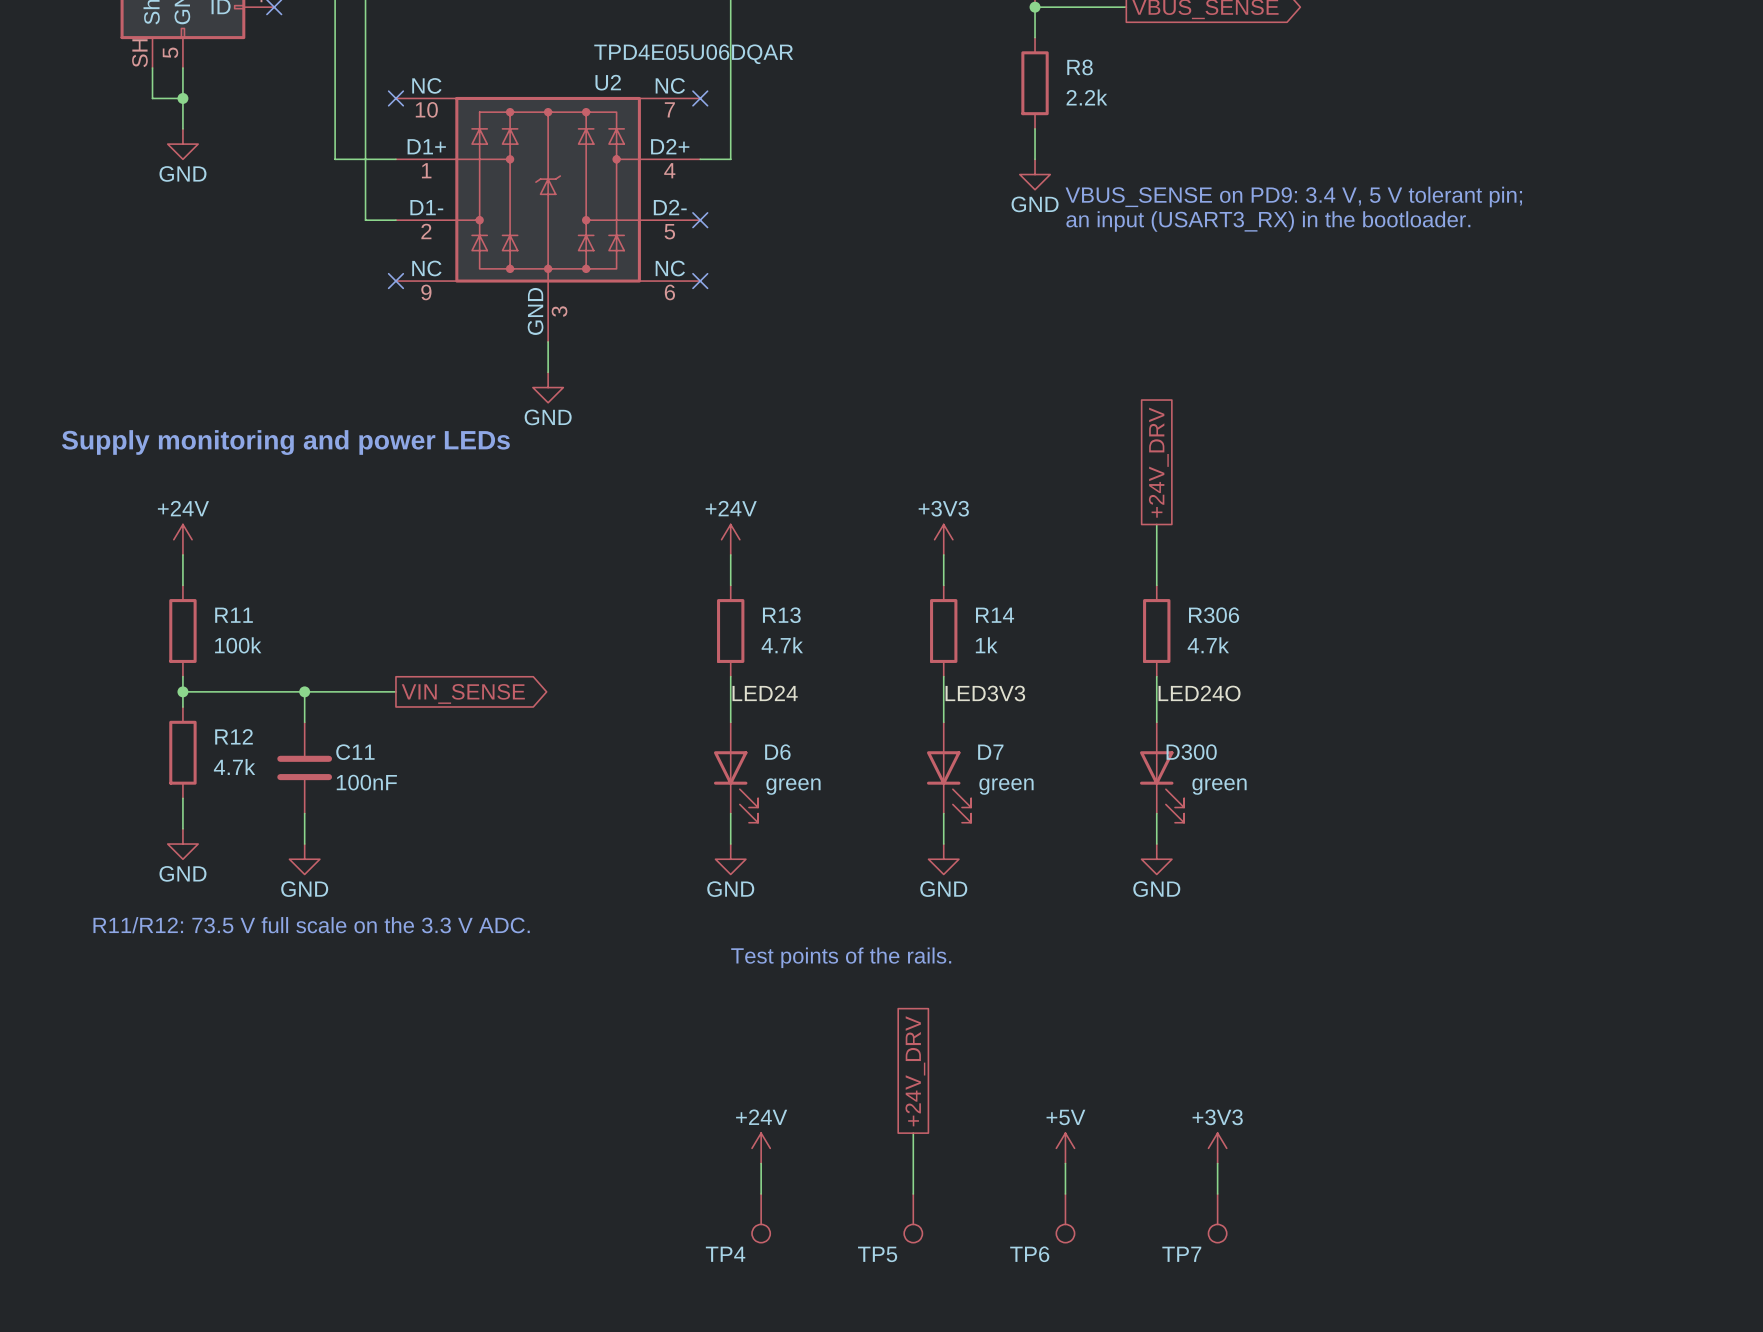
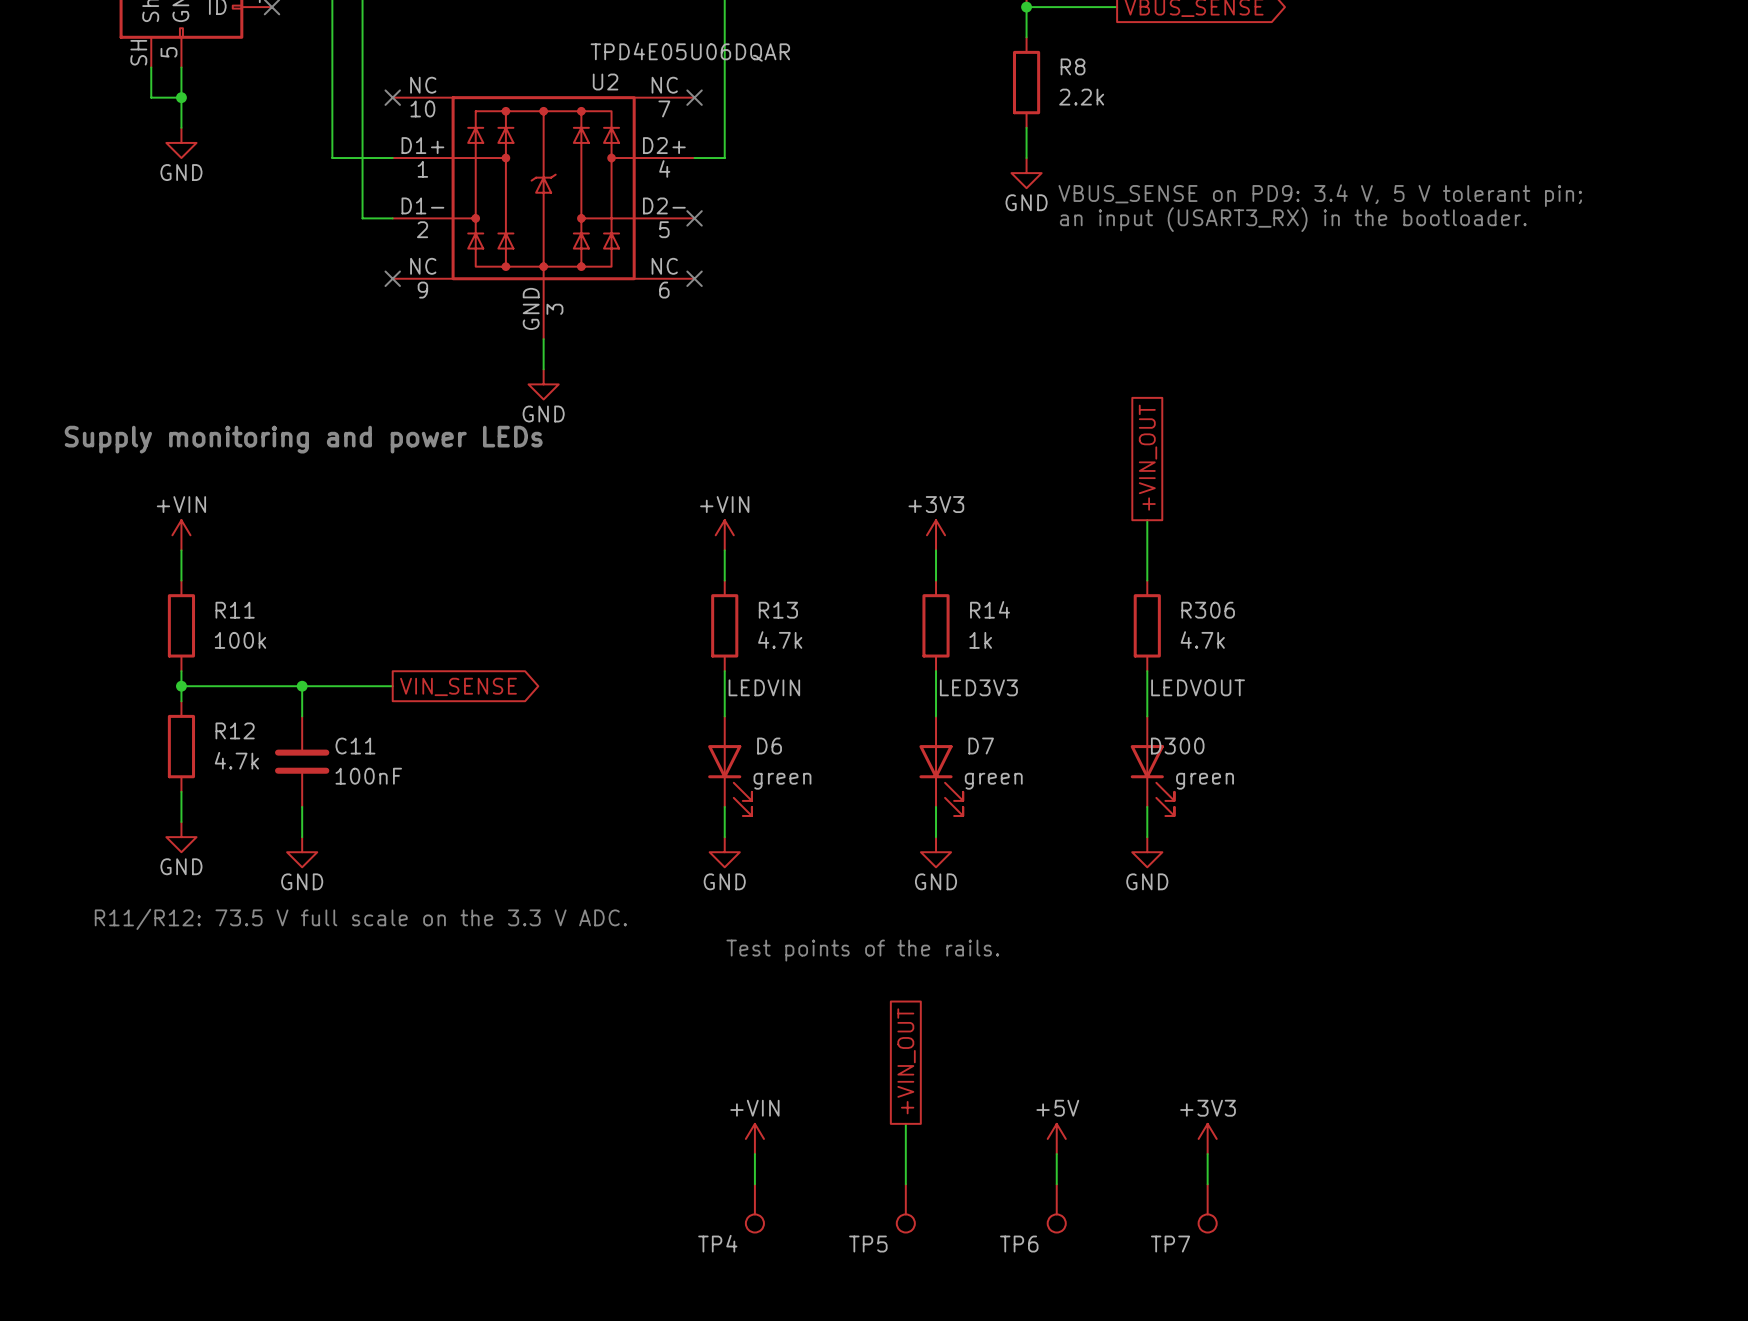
global label: +24V_DRV (1158, 462) -> +VIN_OUT (1148, 457)
power symbol: +24V (182, 539) -> +VIN (181, 535)
power symbol: +24V (730, 539) -> +VIN (724, 535)
label: LED24 (765, 693) -> LEDVIN (764, 687)
label: LED24O (1199, 693) -> LEDVOUT (1198, 687)
global label: +24V_DRV (915, 1071) -> +VIN_OUT (906, 1061)
power symbol: +24V (761, 1148) -> +VIN (754, 1138)

